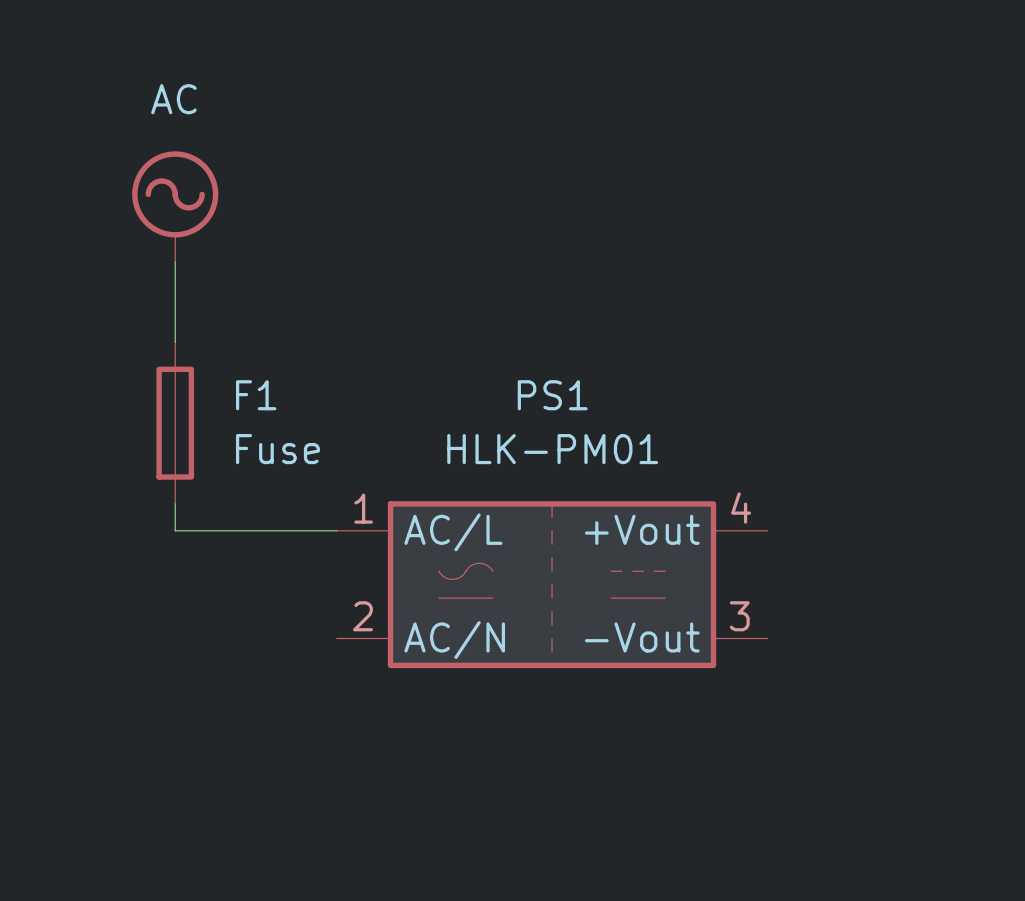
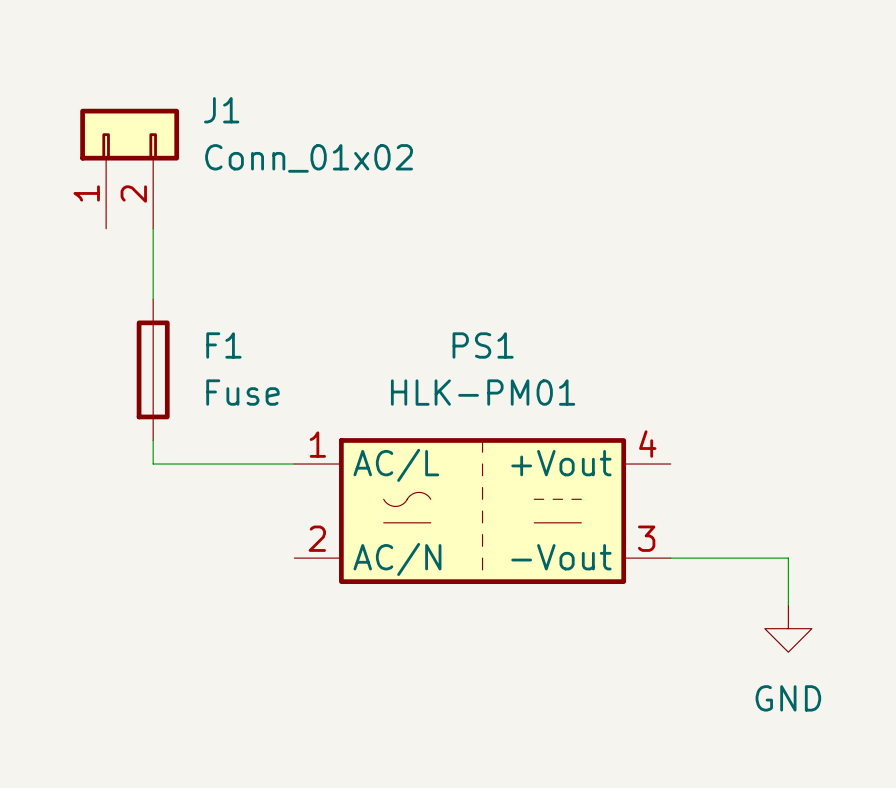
J1: none -> Conn_01x02 (129, 168)
power symbol: AC (175, 206) -> none
wire: none -> (670, 558) (788, 558) (788, 605)
power symbol: none -> GND (788, 628)

